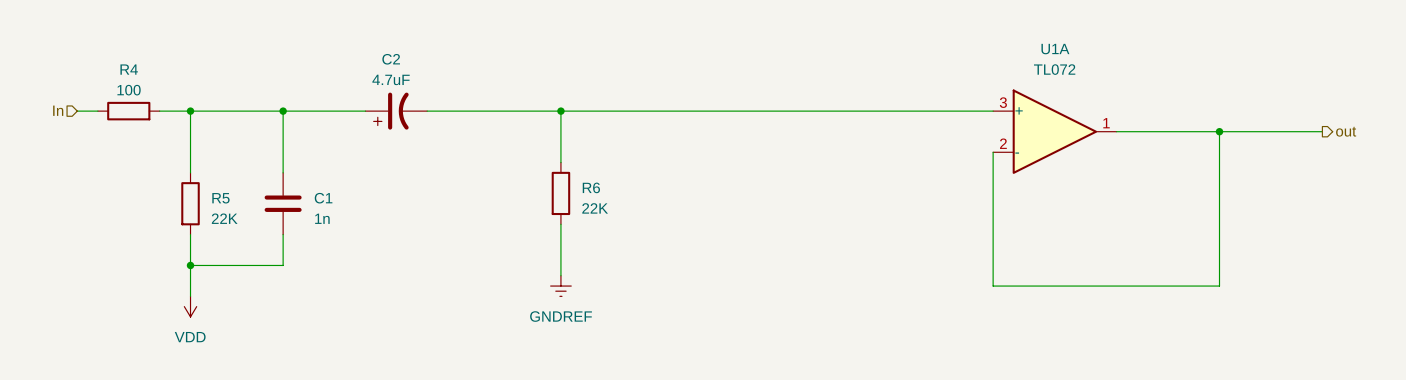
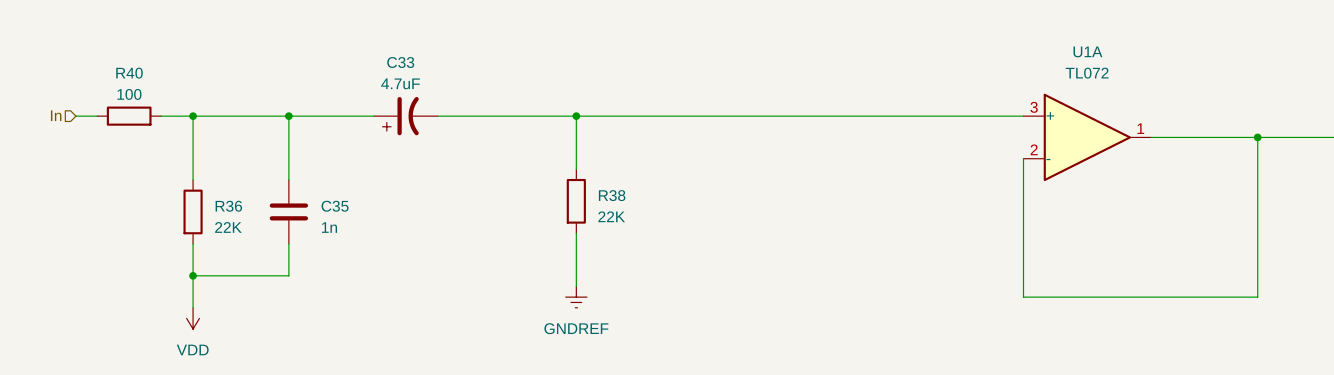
C2 name: C2 (391, 59) -> C33 (400, 62)
R4 name: R4 (129, 69) -> R40 (129, 73)
R6 name: R6 (591, 187) -> R38 (612, 195)
R5 name: R5 (220, 198) -> R36 (228, 206)
C1 name: C1 (323, 198) -> C35 (335, 206)

